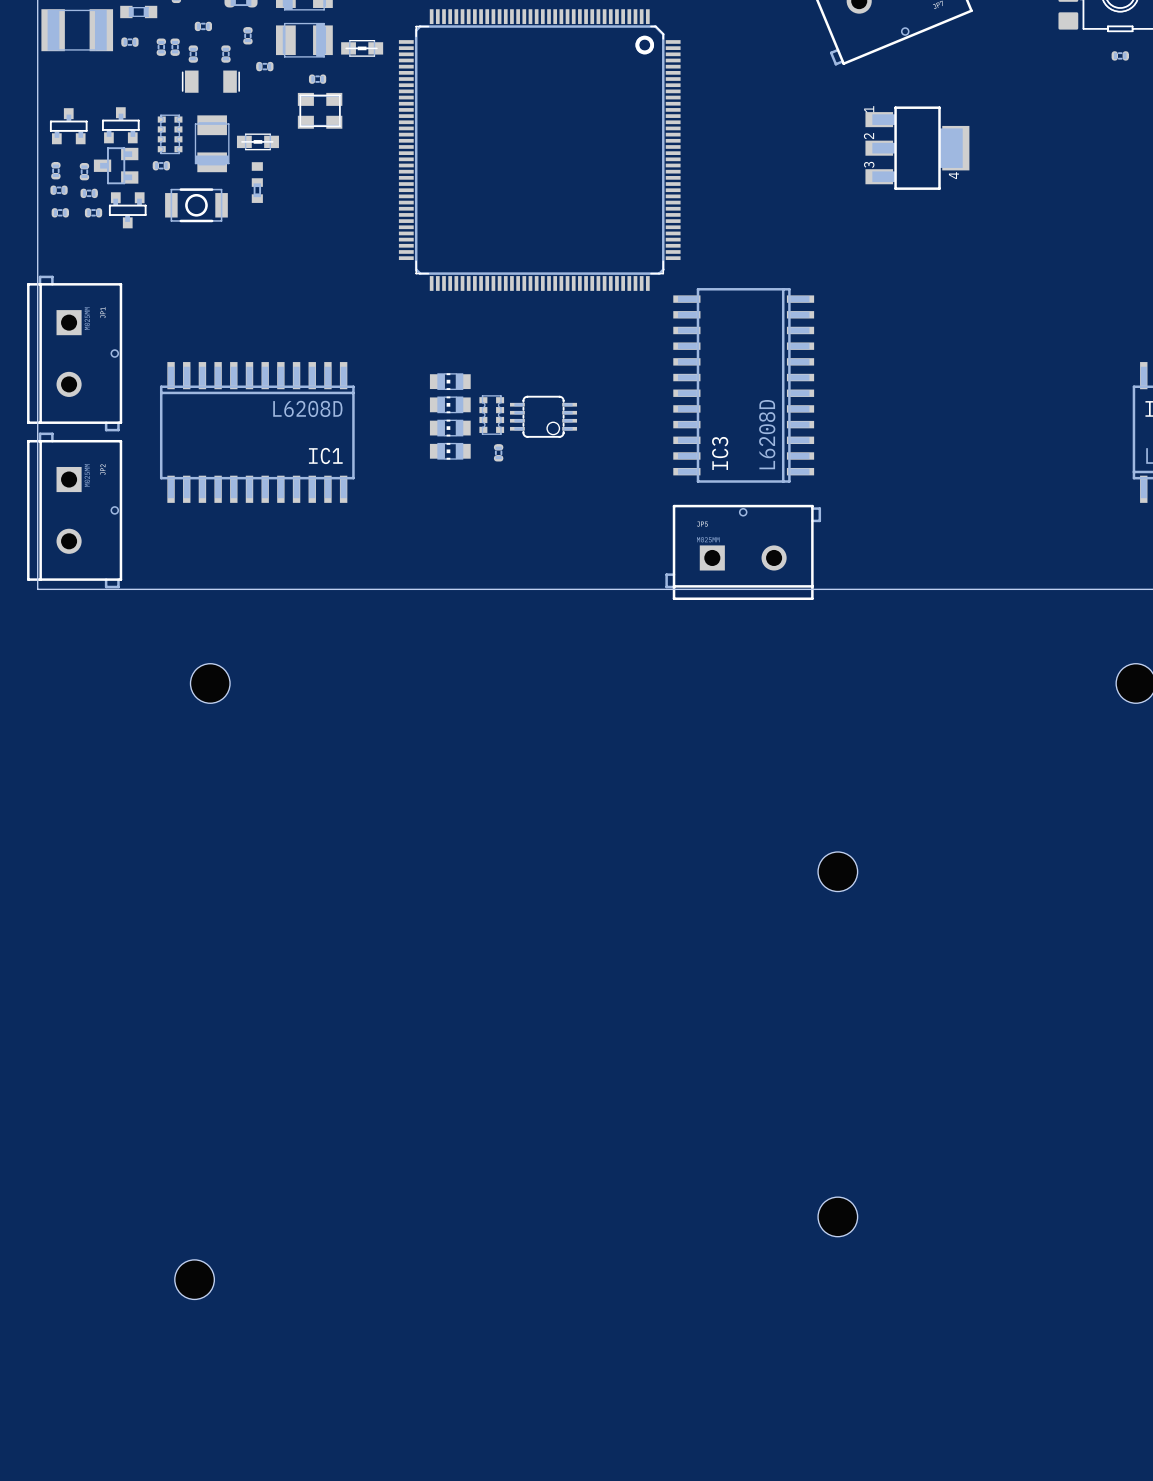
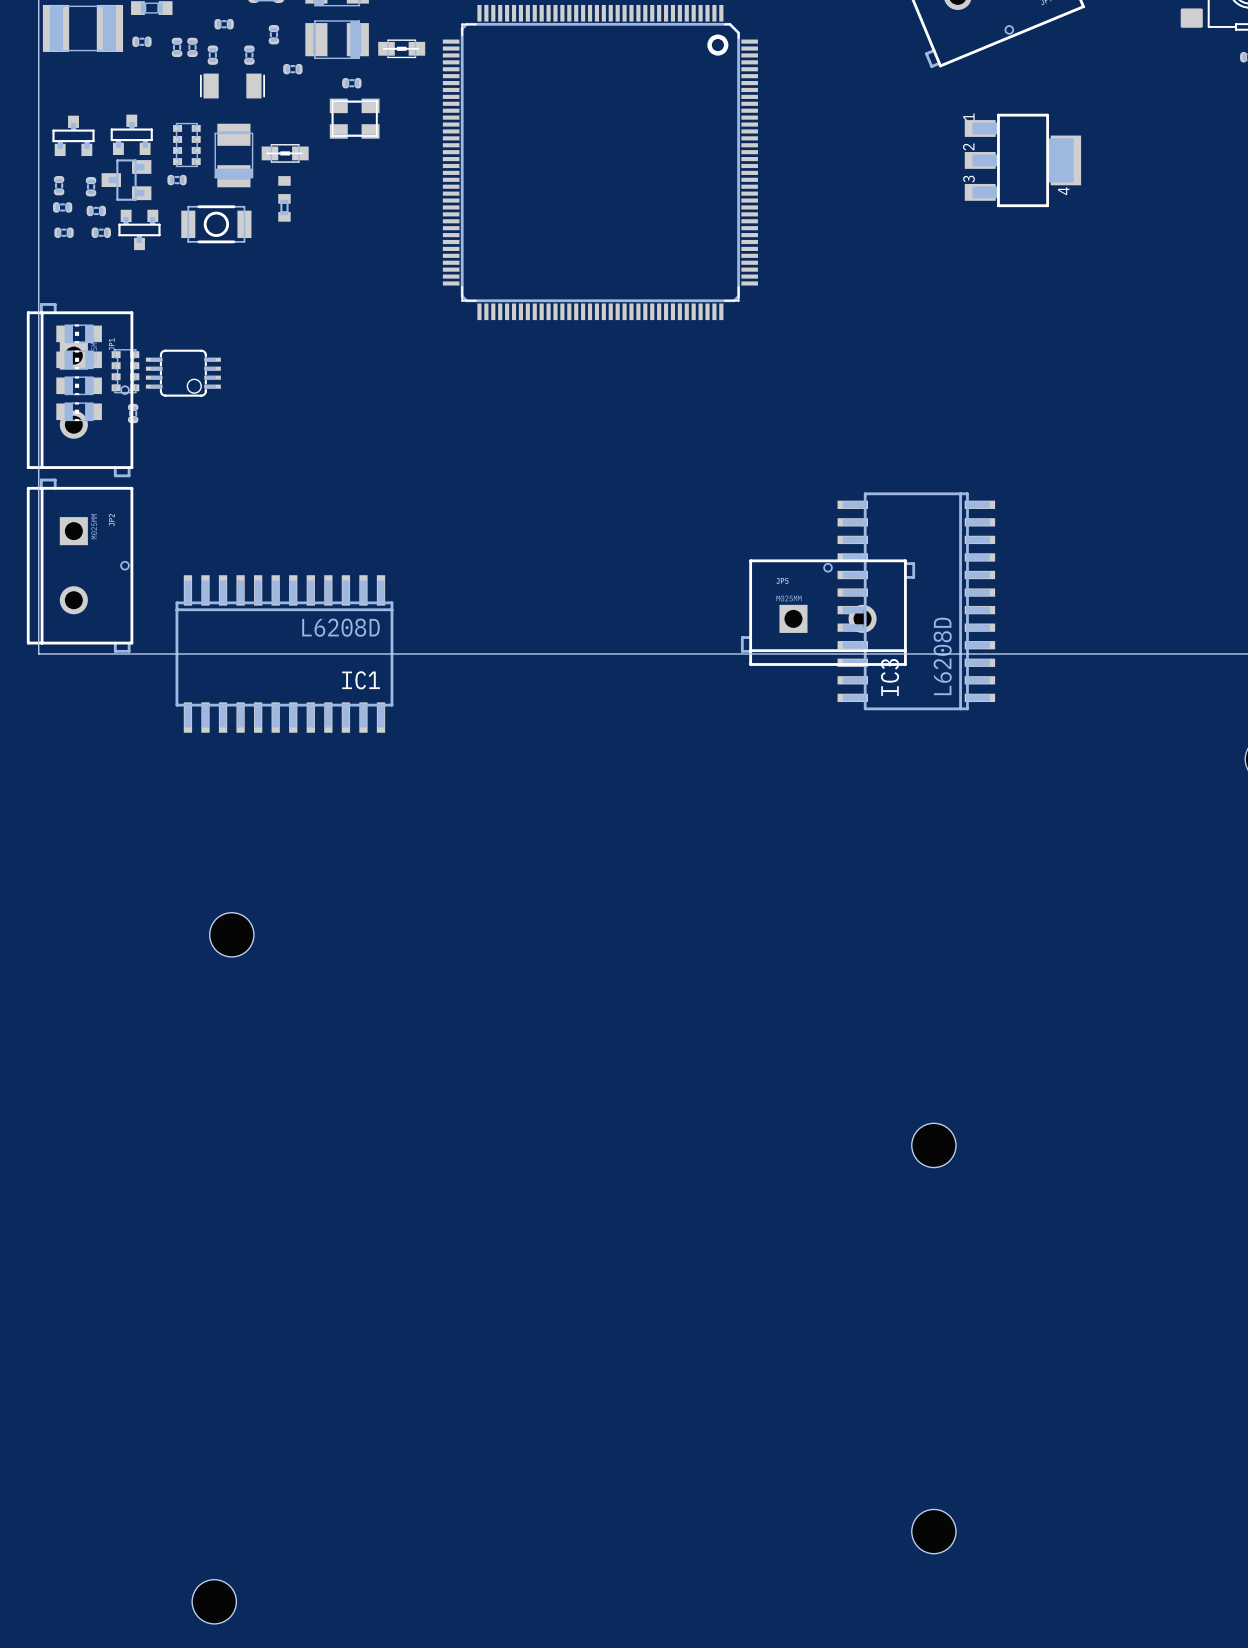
part: none -> (79, 333)
part: none -> (79, 359)
part: none -> (125, 371)
part: none -> (183, 373)
part: none -> (79, 385)
part: none -> (79, 411)
part: none -> (133, 413)
part: (450, 381) -> none
IC3 position: (743, 385) -> (916, 601)
part: (450, 404) -> none
part: (491, 415) -> none
part: (543, 416) -> none
part: (450, 428) -> none
IC1 position: (257, 432) -> (284, 653)
part: (450, 451) -> none
part: (498, 452) -> none
hole position: (210, 683) -> (231, 934)
hole: (837, 871) -> none
hole: none -> (933, 1145)
hole: (837, 1216) -> none
hole position: (194, 1279) -> (214, 1601)
hole: none -> (933, 1531)

